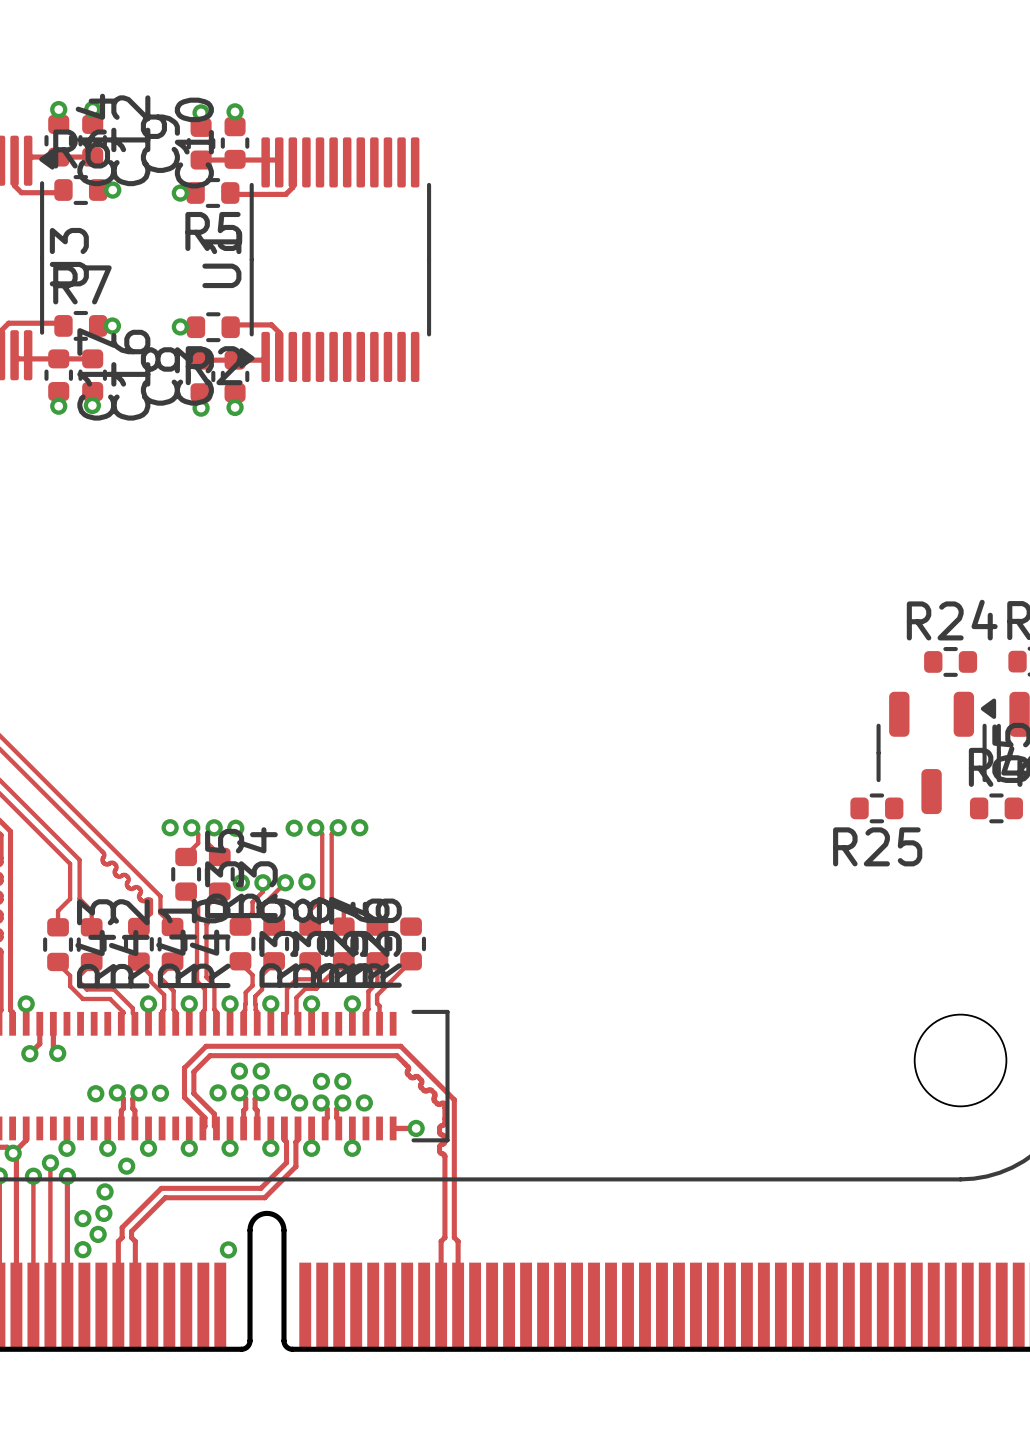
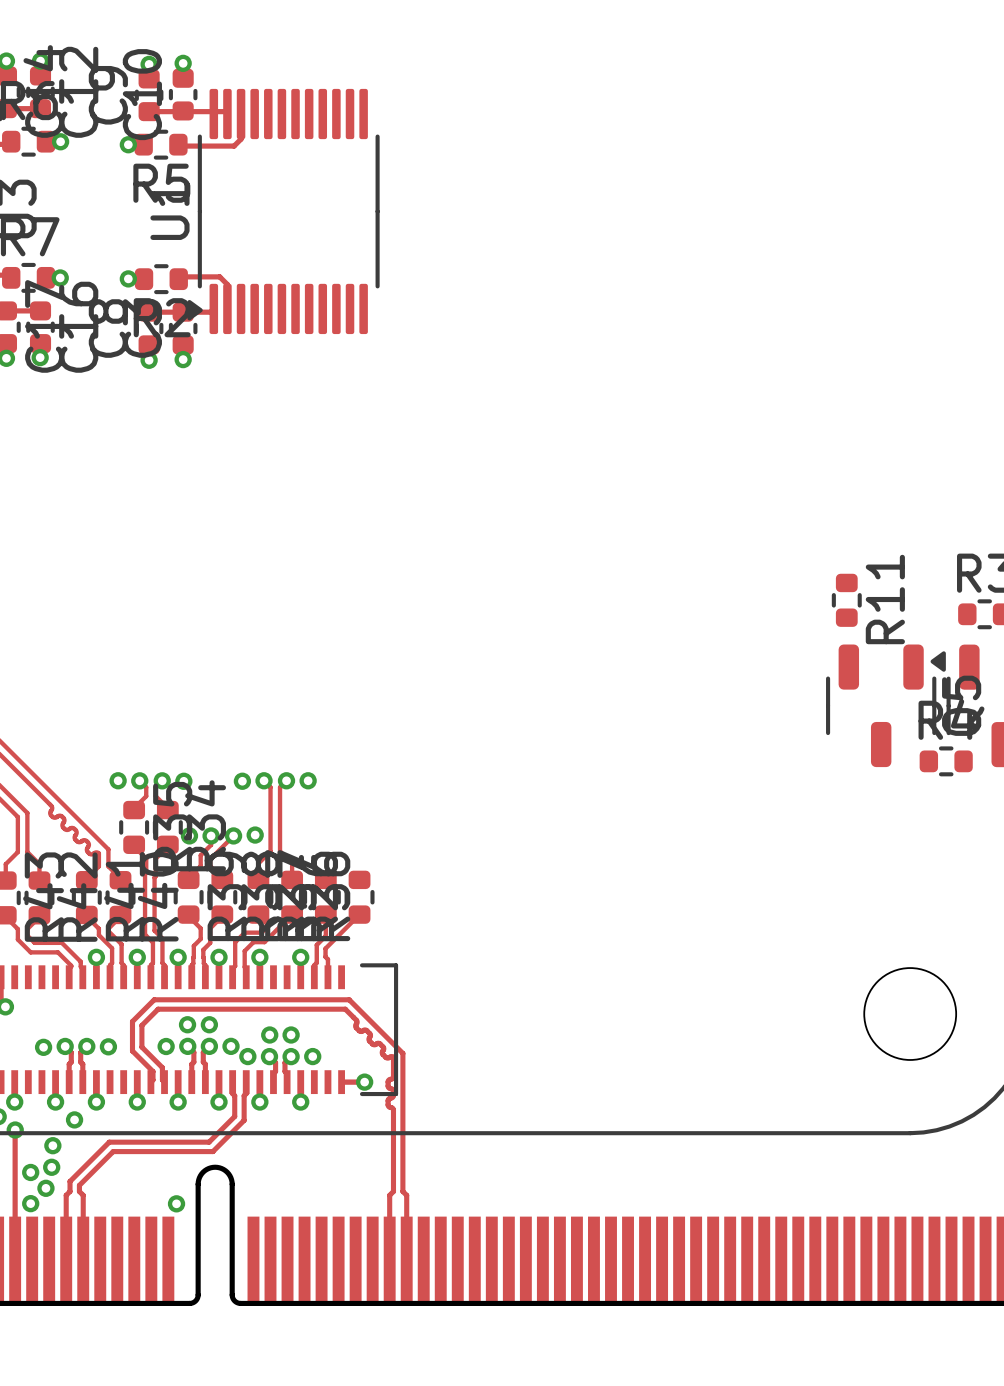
R11: none -> (846, 600)
R24: (950, 661) -> none
R25: (876, 808) -> none

